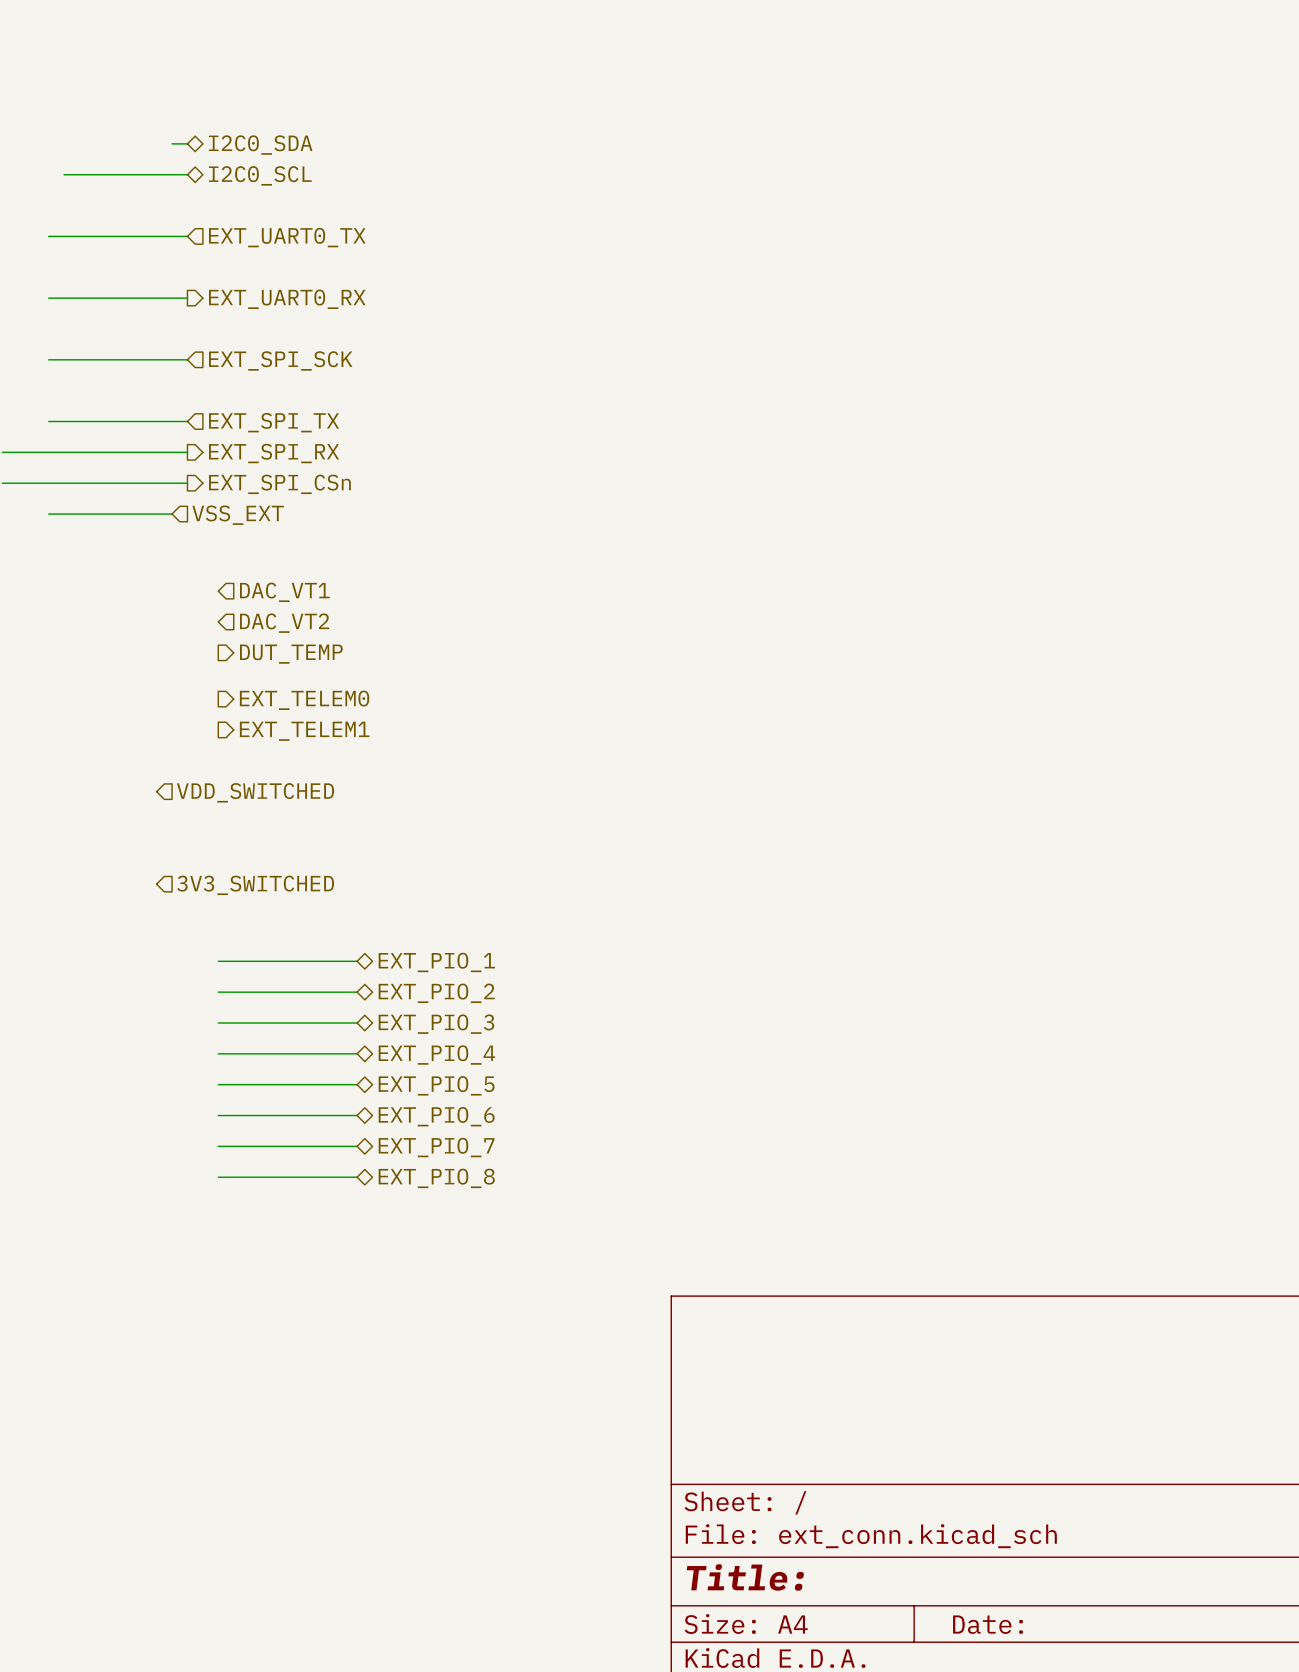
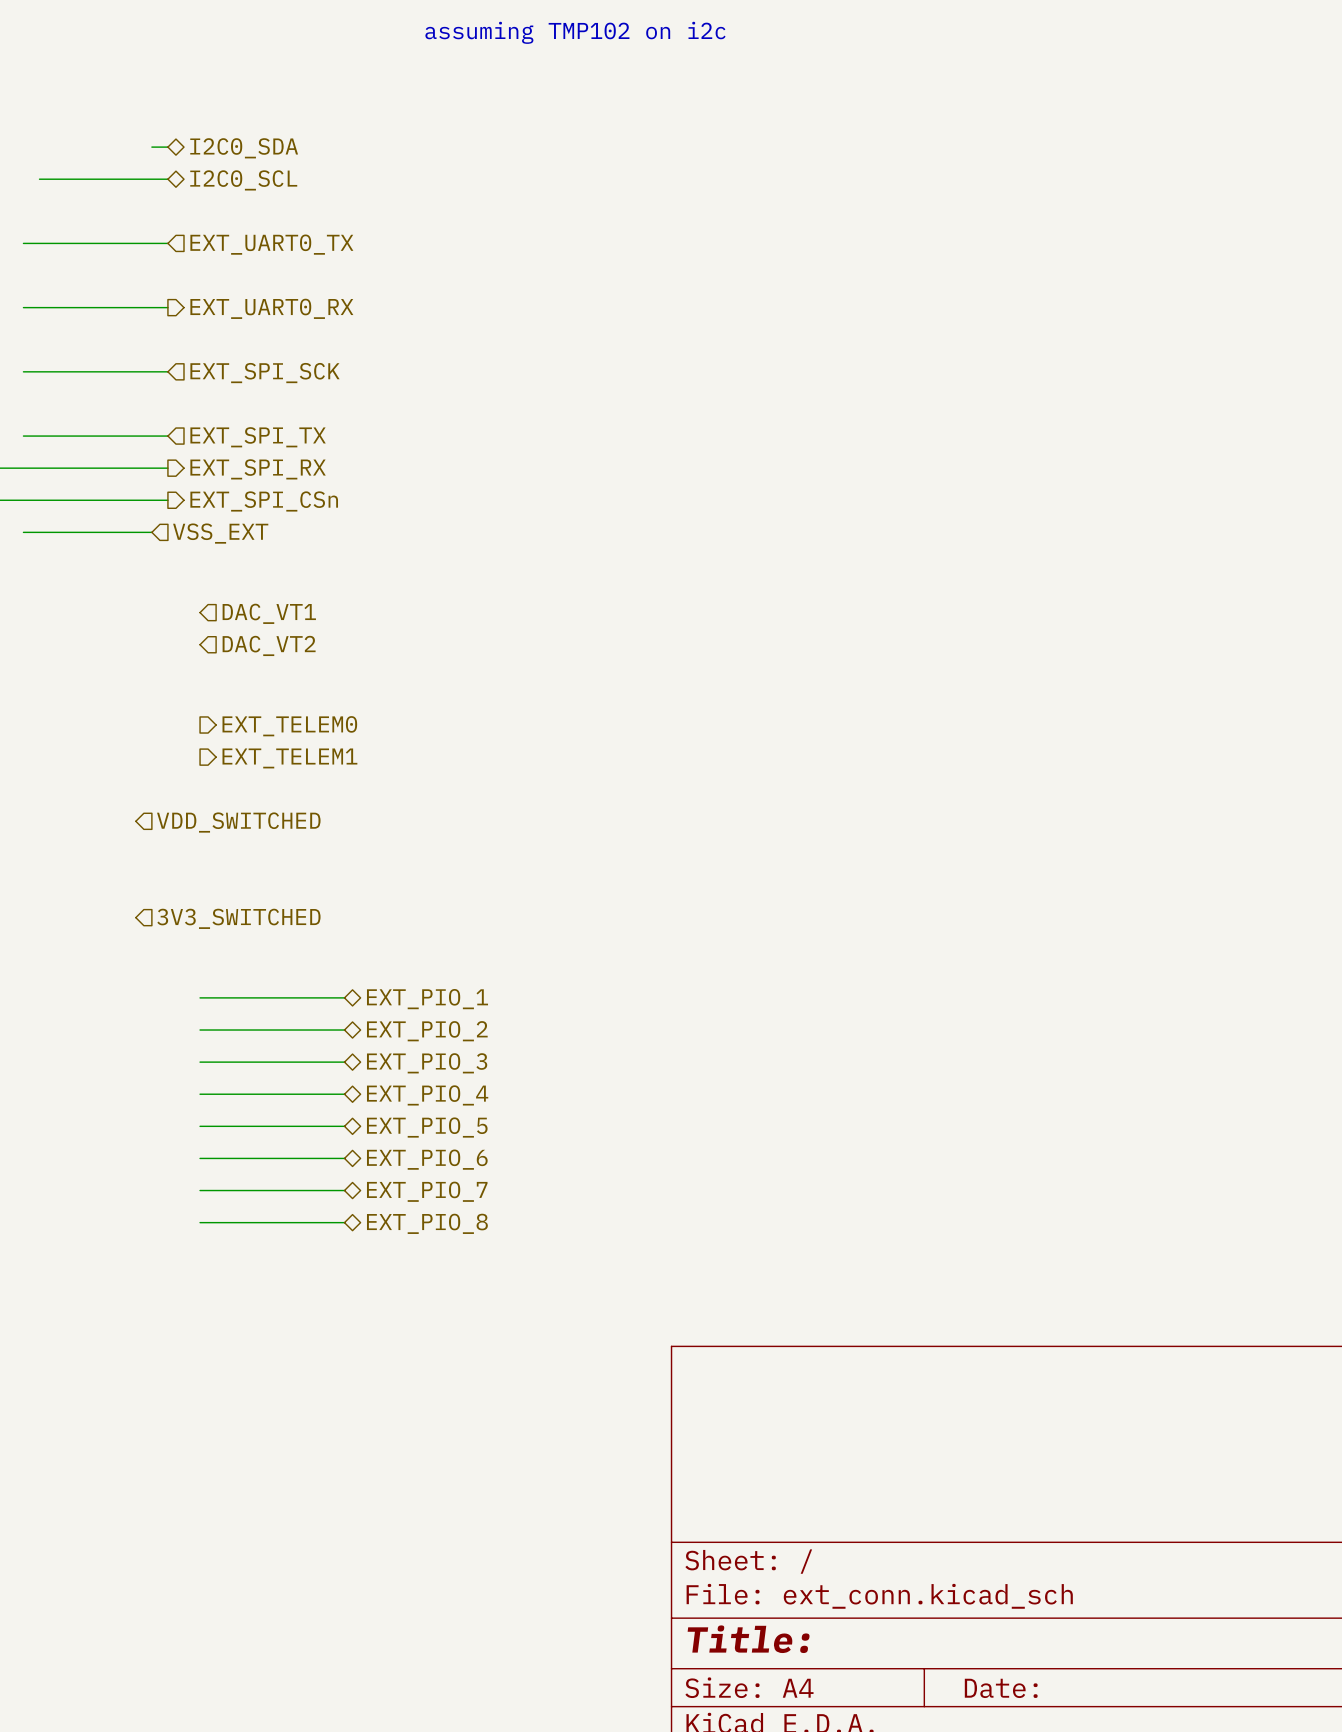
text: none -> assuming TMP102 on i2c (575, 32)
hierarchical label: DUT_TEMP (291, 654) -> none

